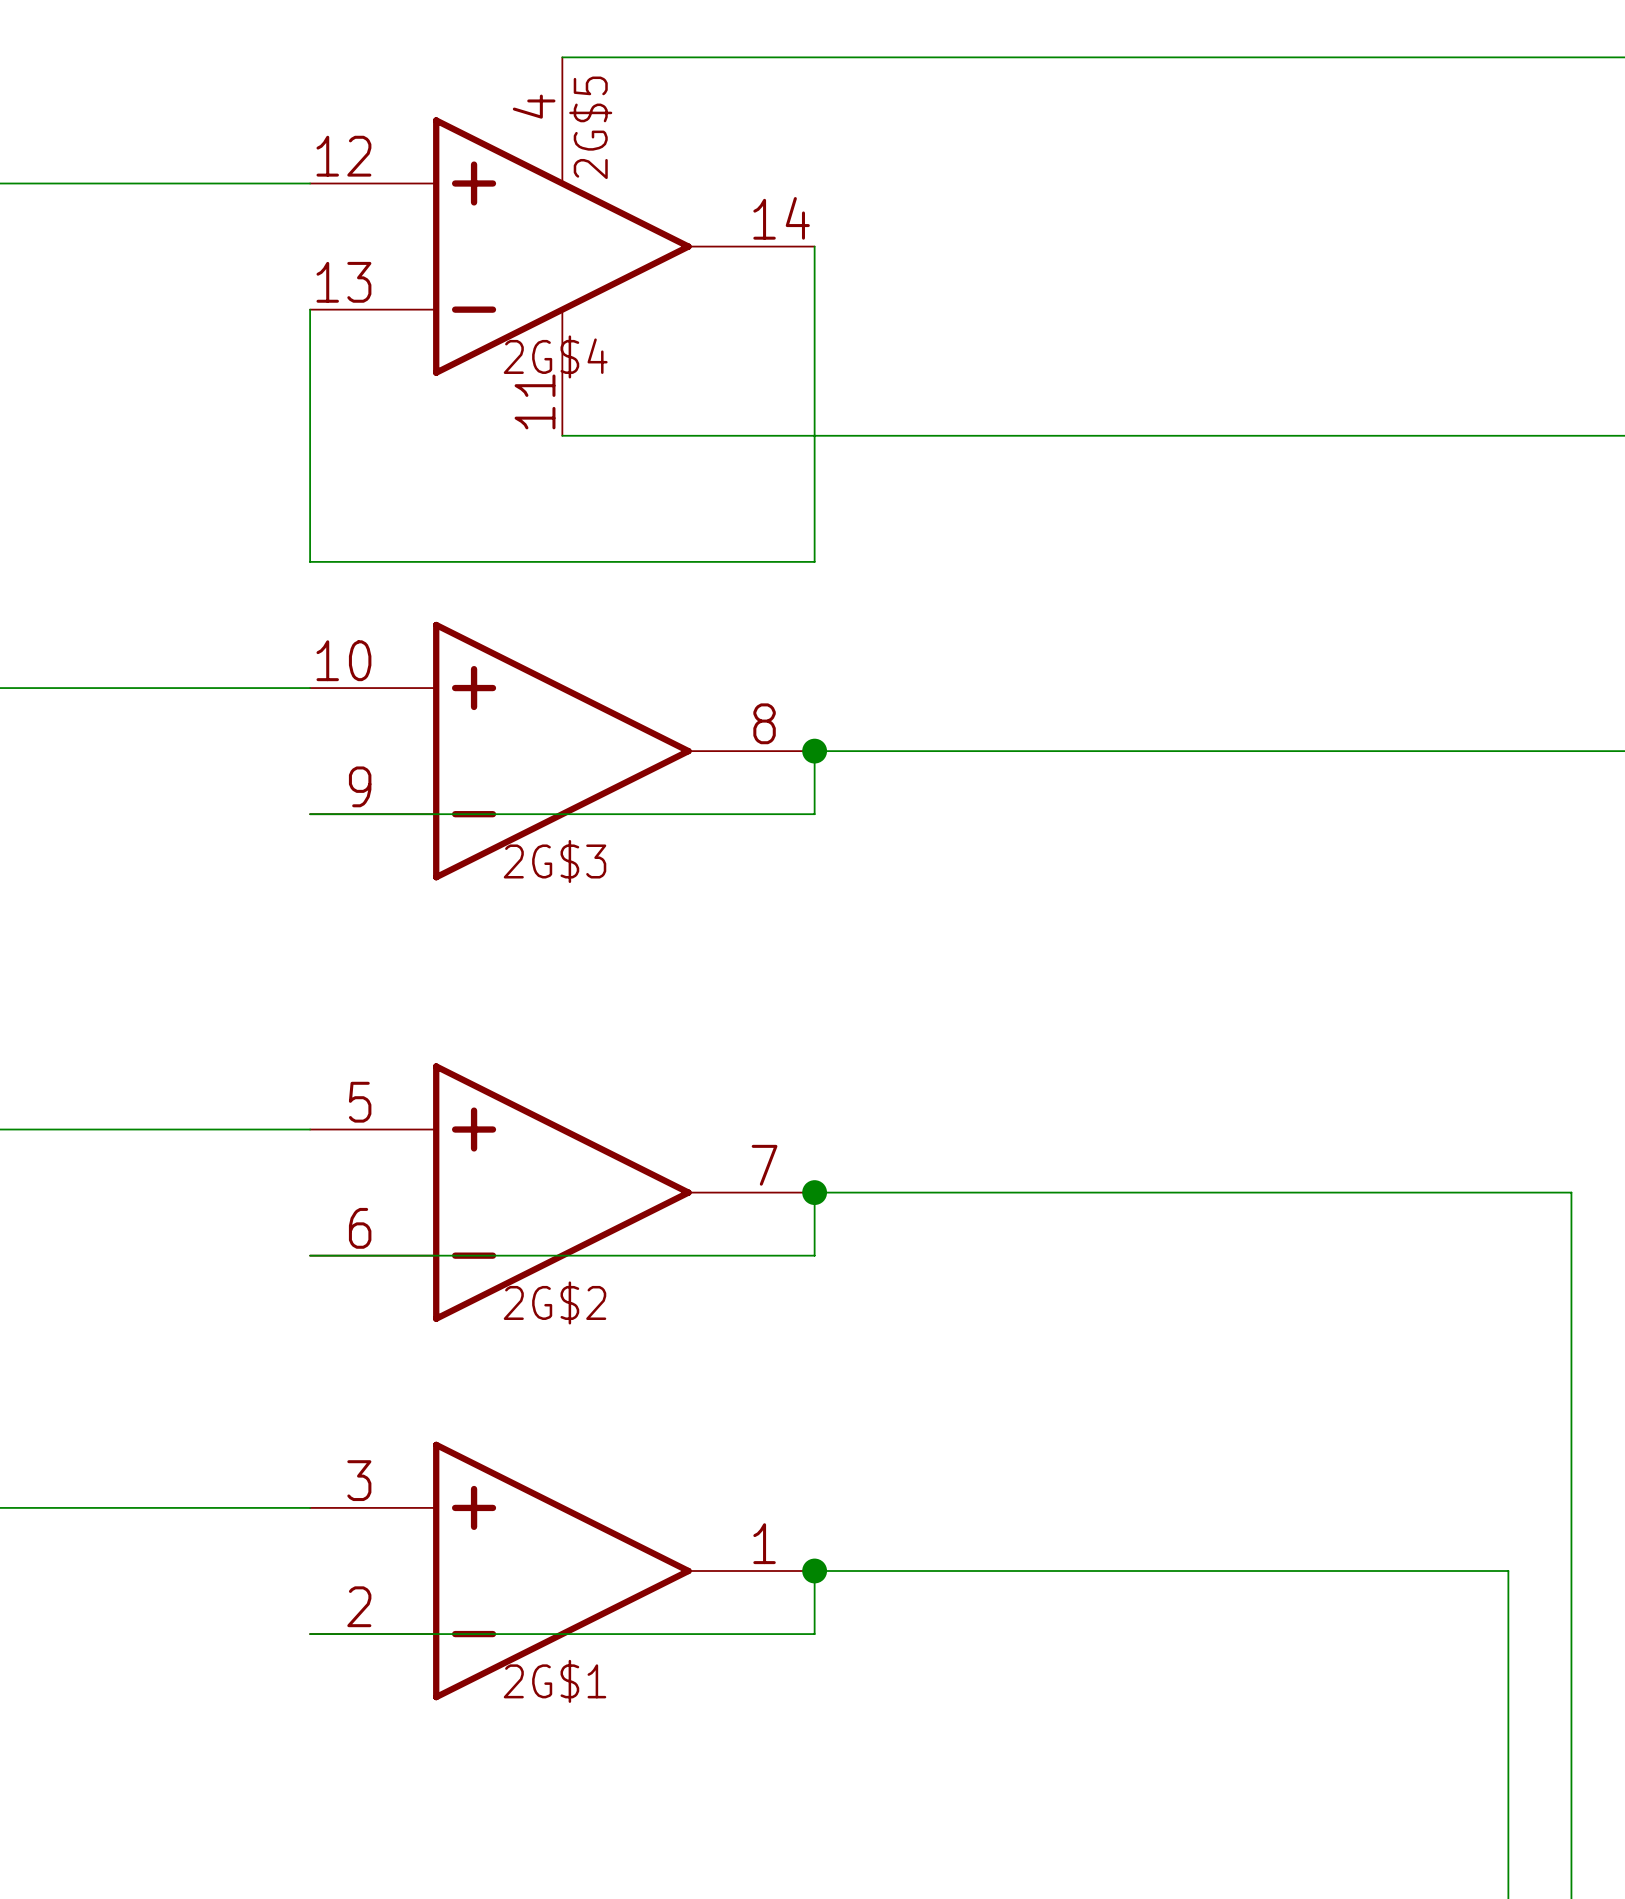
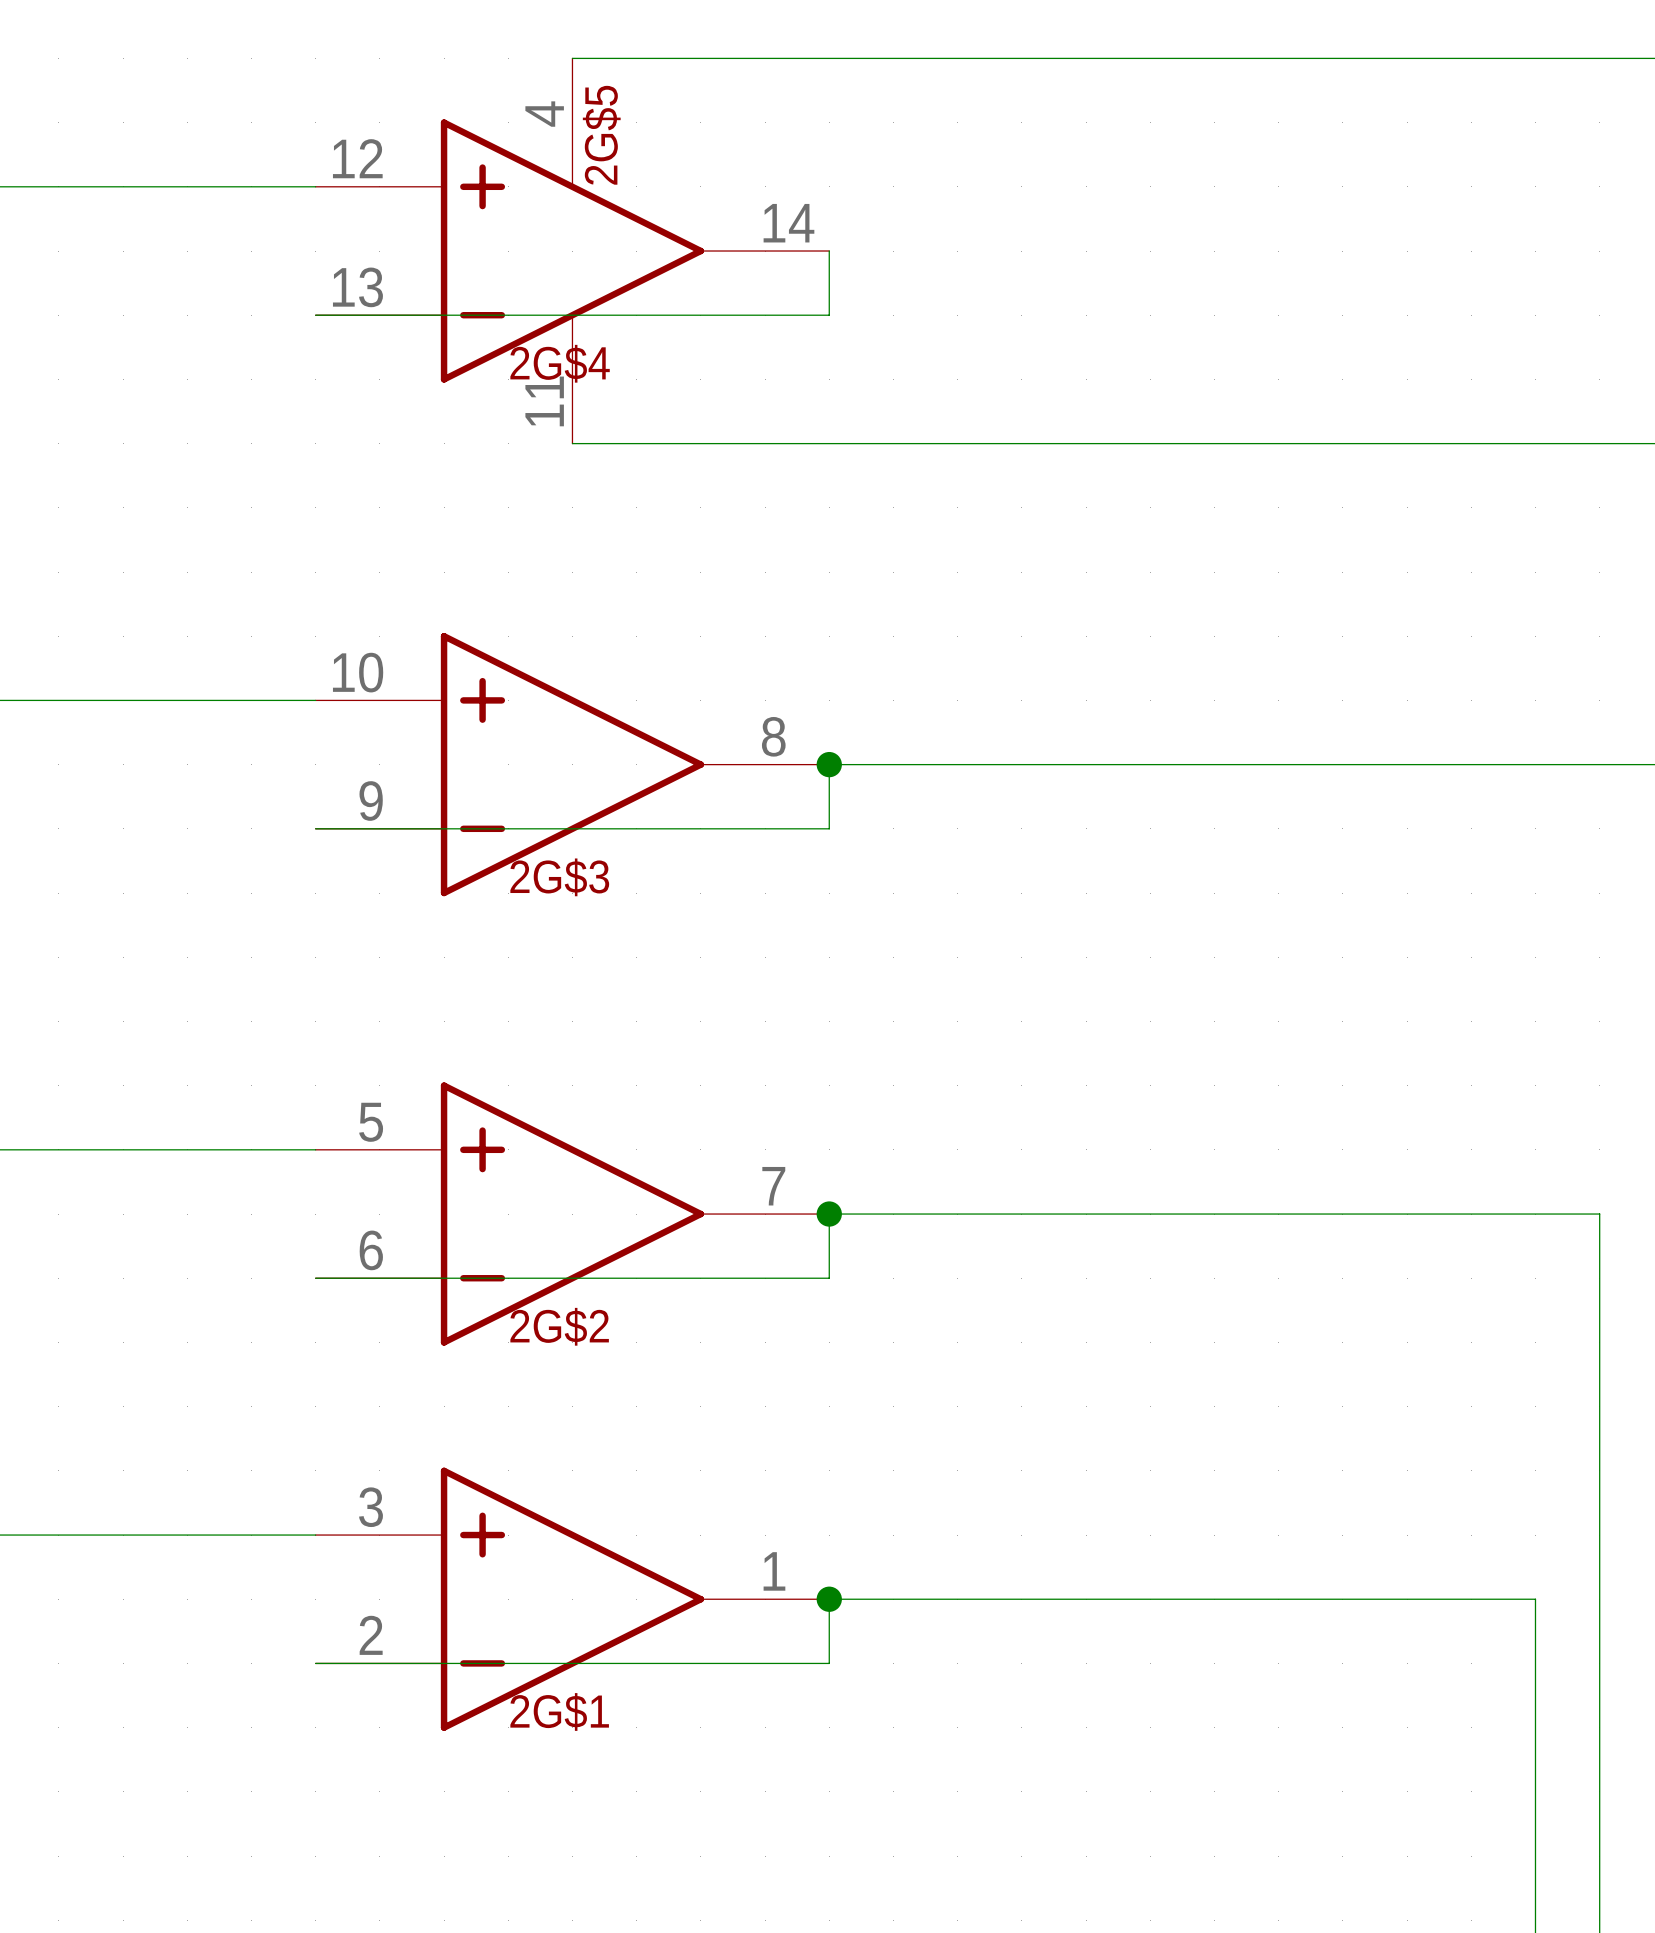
wire: (310, 309) (310, 561) (814, 561) (814, 309) -> (315, 315) (829, 315)

